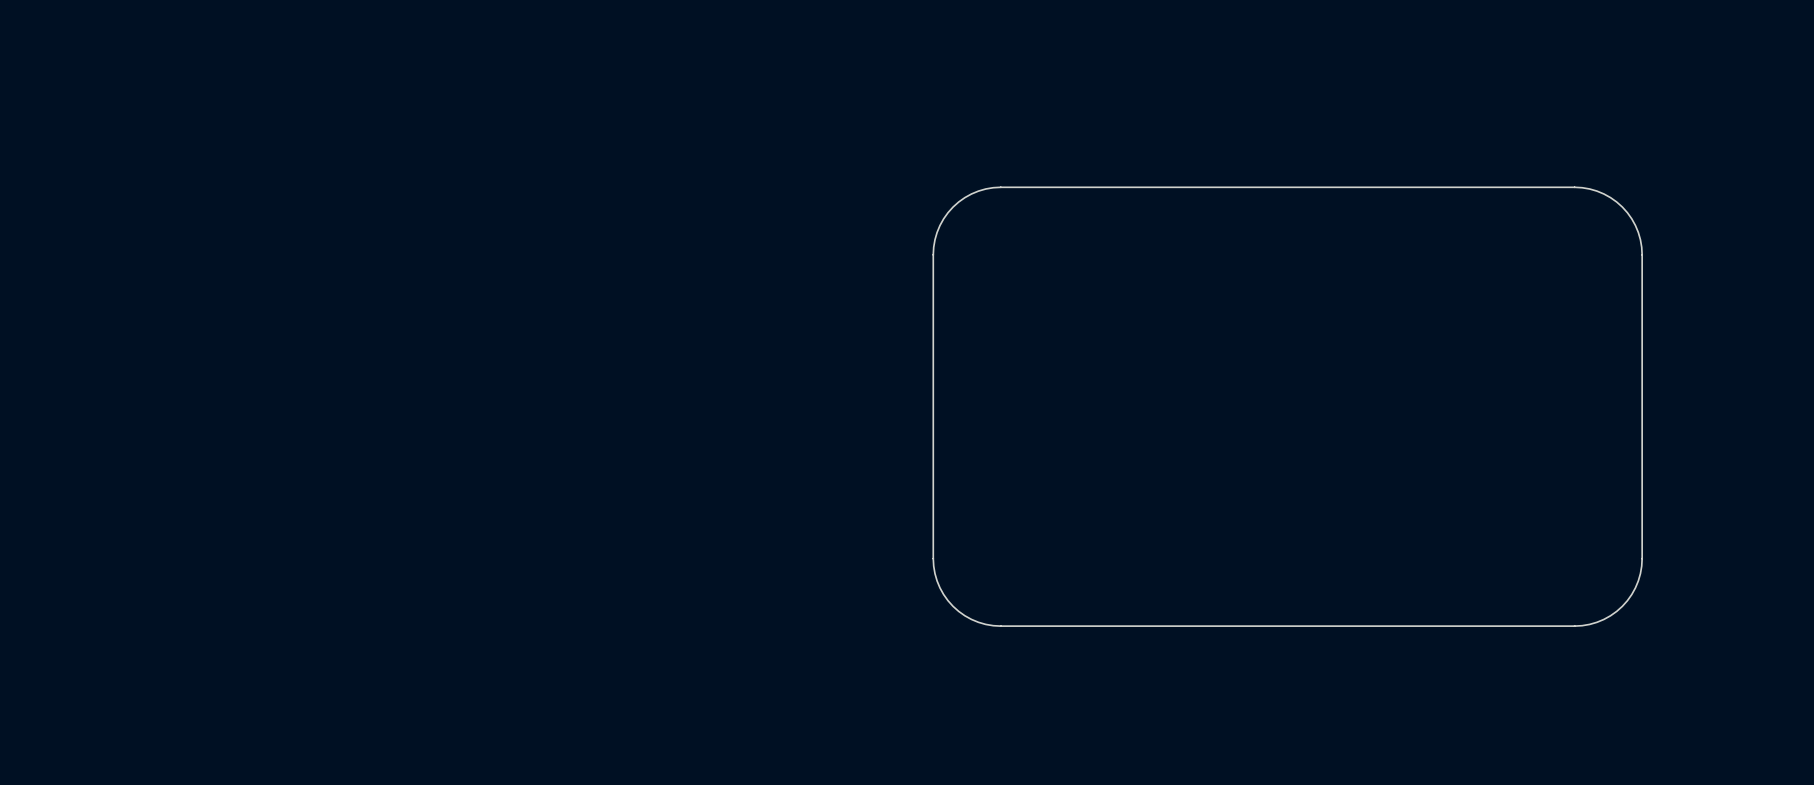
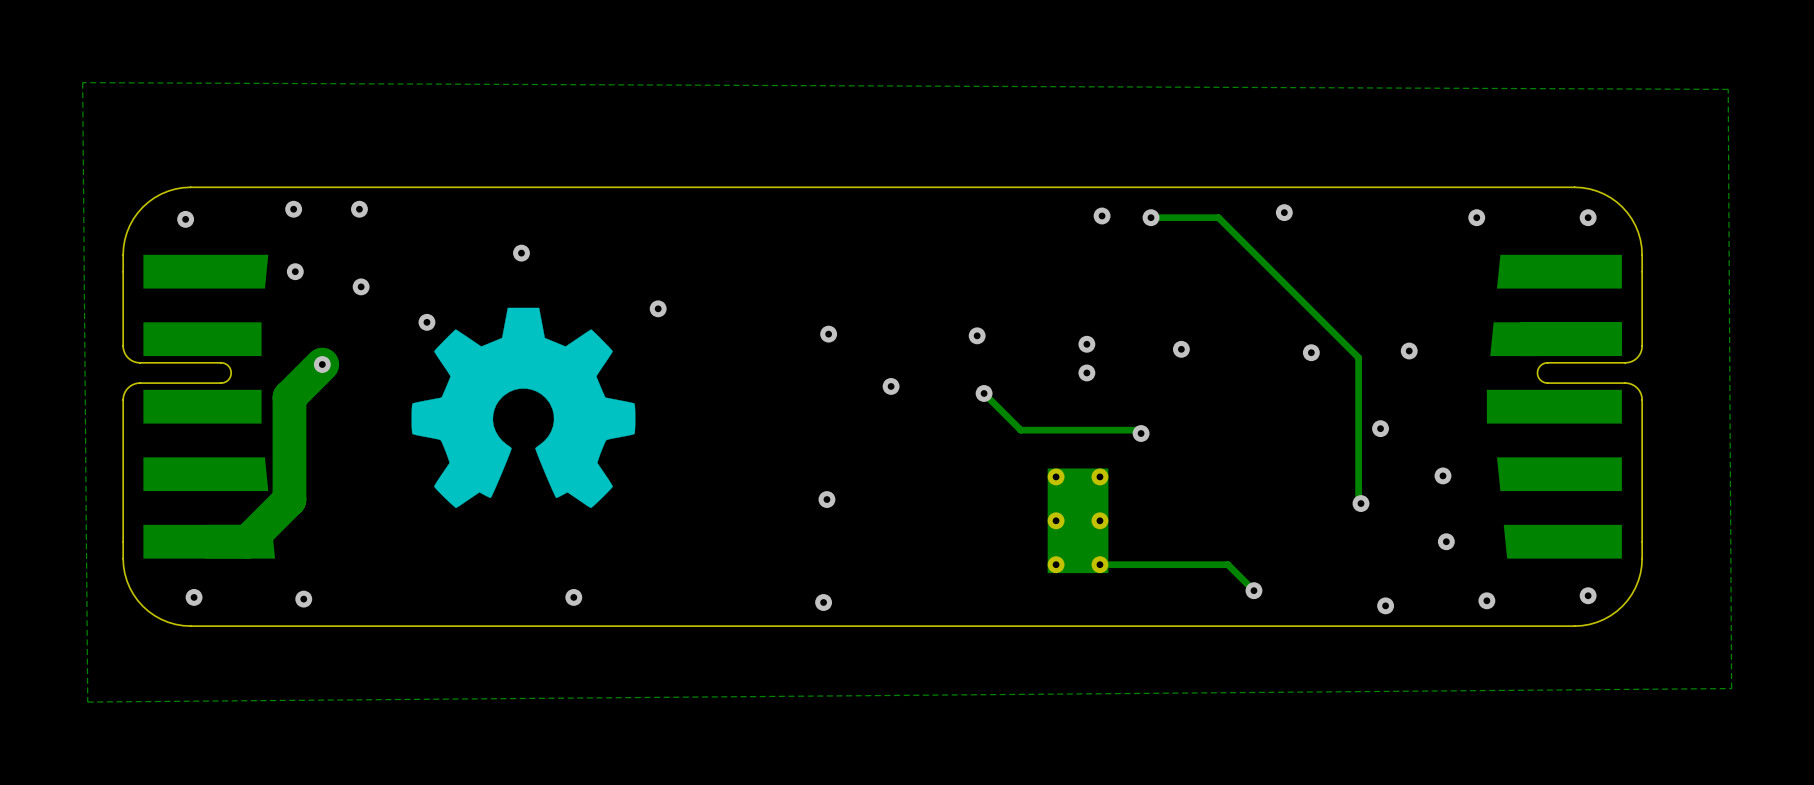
zone outline: none -> (82, 82) (1728, 89) (1731, 688) (87, 702) (82, 82)
board edge: (1000, 187) (978, 191) (964, 197) (953, 207) (939, 225) (934, 239) (933, 254) (933, 558) (934, 573) (943, 594) (958, 611) (978, 622) (1000, 626) -> (1000, 187) (183, 187) (168, 191) (154, 197) (137, 212) (129, 225) (124, 239) (123, 271)
via: none -> (293, 209)
via: none -> (359, 209)
via: none -> (1284, 212)
via: none -> (1102, 215)
track: none -> (1151, 217) (1218, 217) (1358, 357) (1358, 501) (1360, 503)
via: none -> (1151, 217)
via: none -> (1476, 217)
via: none -> (1588, 217)
via: none -> (185, 219)
via: none -> (521, 253)
via: none -> (295, 271)
board edge: (1642, 271) (1642, 541) -> none
via: none -> (361, 286)
drawing: none -> [411, 307, 636, 509]
via: none -> (658, 308)
via: none -> (426, 322)
via: none -> (828, 334)
via: none -> (977, 335)
via: none -> (1086, 344)
via: none -> (1181, 349)
via: none -> (1409, 351)
via: none -> (1311, 352)
track: none -> (322, 364) (289, 397) (289, 499) (247, 541) (207, 541)
via: none -> (322, 364)
via: none -> (1086, 372)
via: none -> (891, 386)
track: none -> (984, 393) (1020, 430) (1137, 430) (1141, 433)
via: none -> (984, 393)
part: none -> (198, 406)
part: none -> (1564, 406)
via: none -> (1380, 428)
via: none -> (1141, 433)
via: none -> (1442, 475)
via: none -> (826, 499)
via: none -> (1360, 503)
part: none -> (1078, 520)
board edge: none -> (123, 541) (124, 573) (129, 587) (137, 600) (154, 615) (168, 622) (183, 625) (1000, 626)
via: none -> (1446, 541)
track: none -> (1099, 564) (1227, 564) (1253, 590)
via: none -> (1253, 590)
via: none -> (1588, 595)
via: none -> (194, 597)
via: none -> (573, 597)
via: none -> (303, 599)
via: none -> (1486, 600)
via: none -> (823, 602)
via: none -> (1385, 605)

